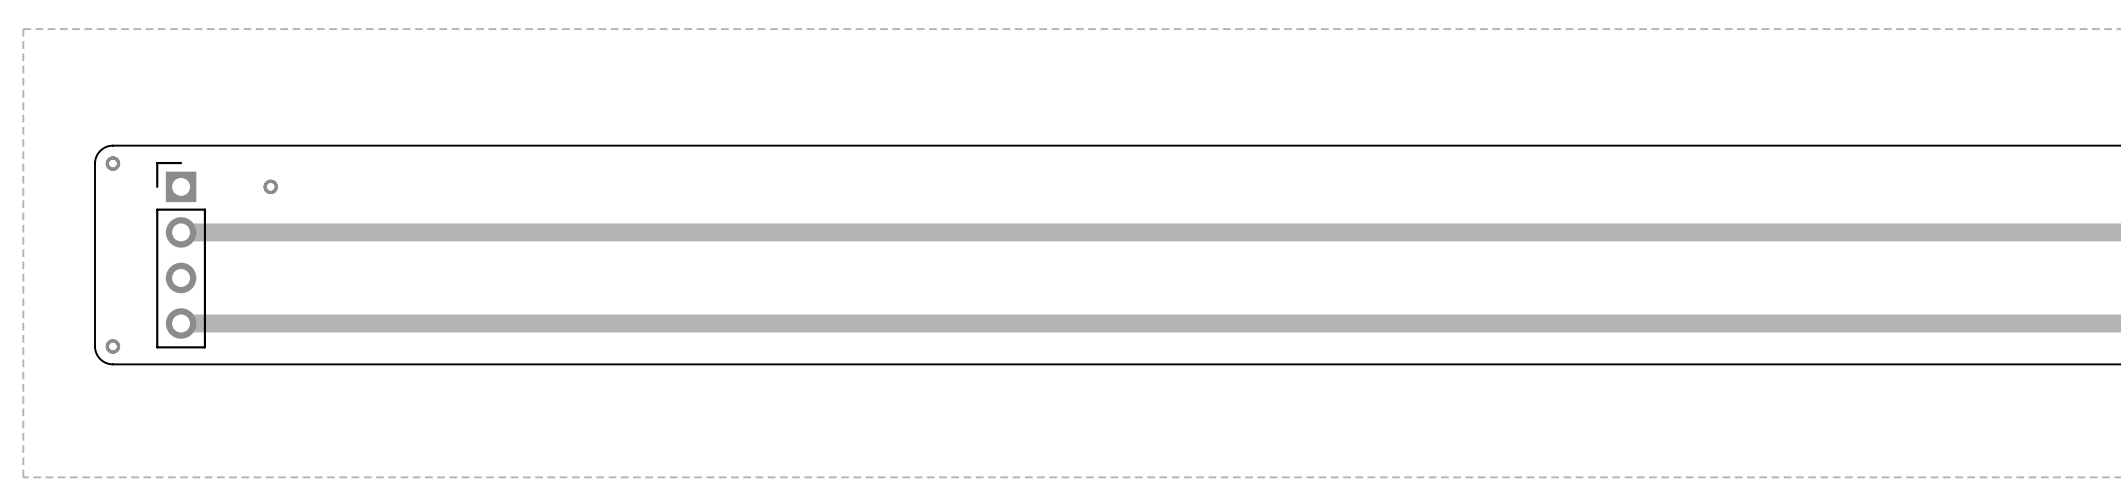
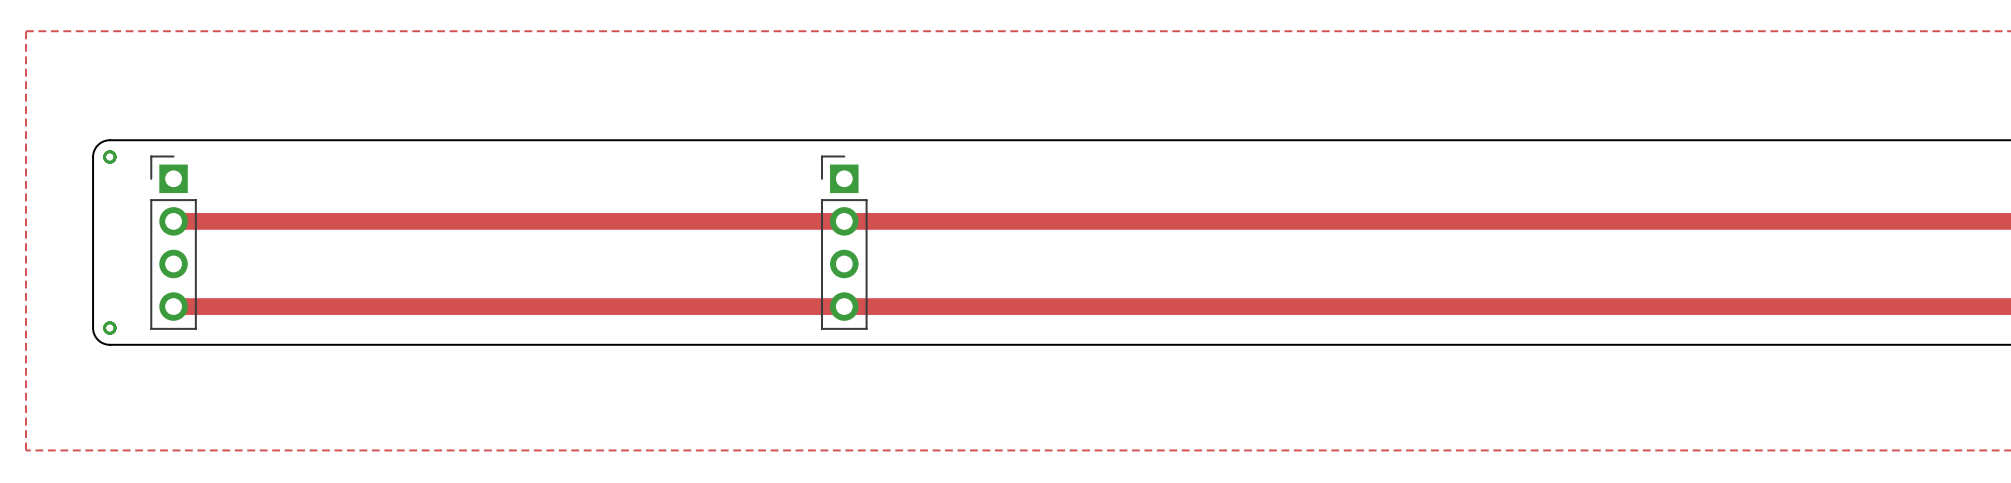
via: (270, 186) -> none
part: none -> (844, 242)

